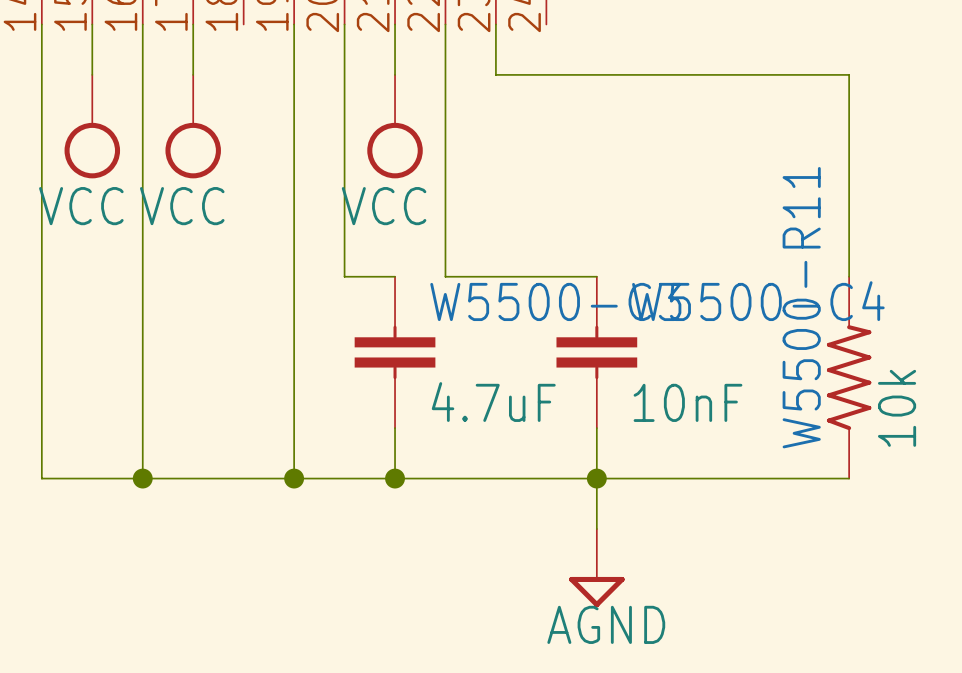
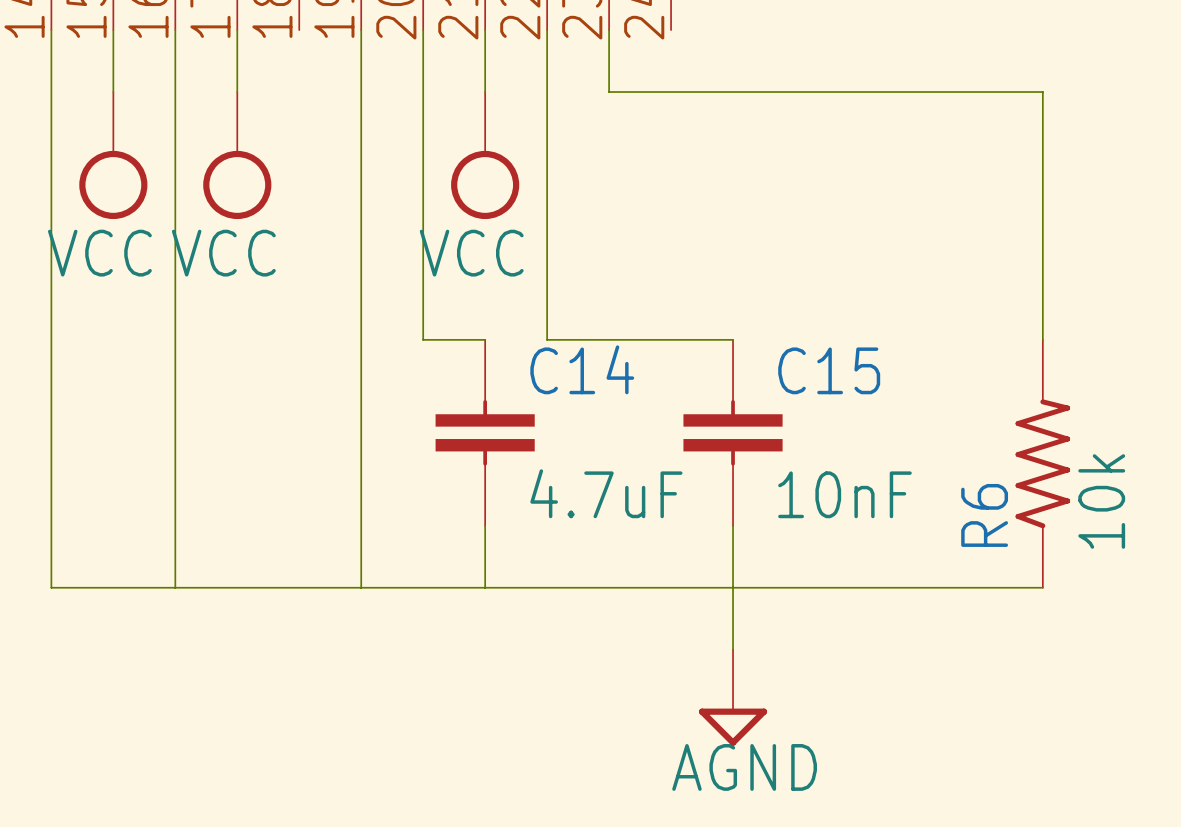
W5500-C3 name: W5500-C3 (555, 301) -> C14 (582, 369)
W5500-C4 name: W5500-C4 (758, 301) -> C15 (829, 370)
W5500-R11 name: W5500-R11 (801, 307) -> R6 (984, 515)
junction: (142, 478) -> none
junction: (294, 478) -> none
junction: (395, 478) -> none
junction: (596, 478) -> none

